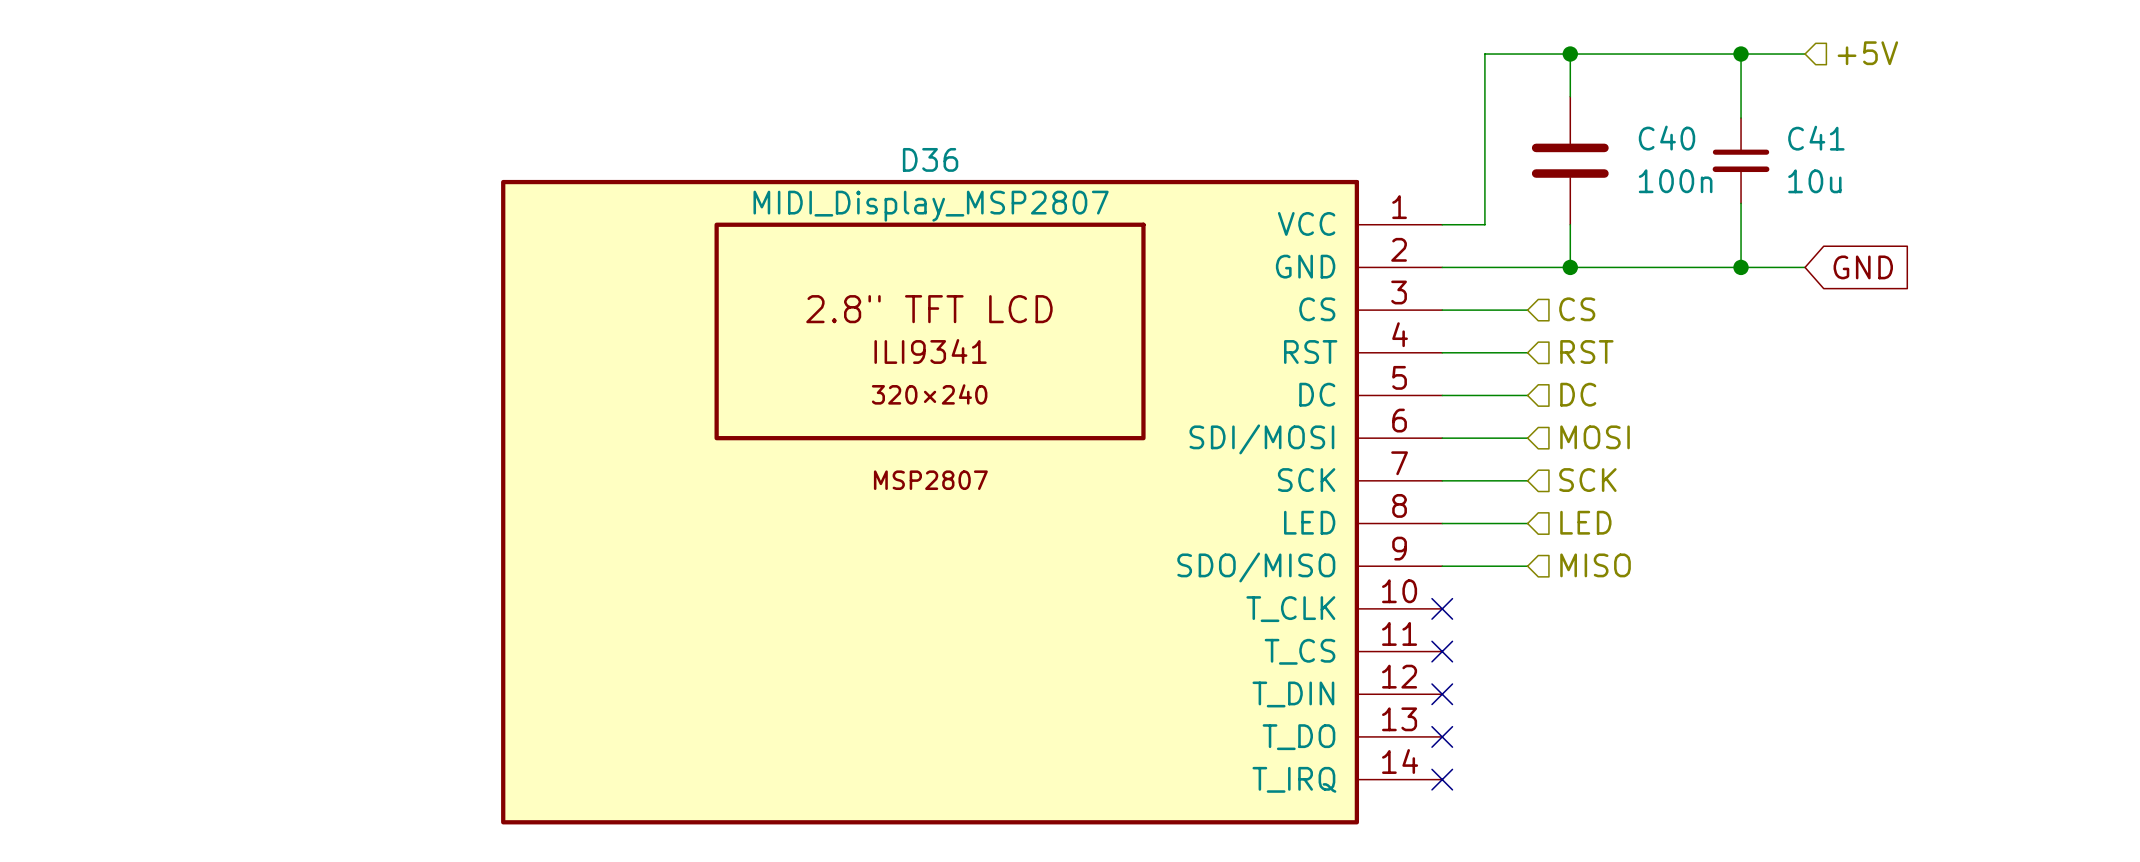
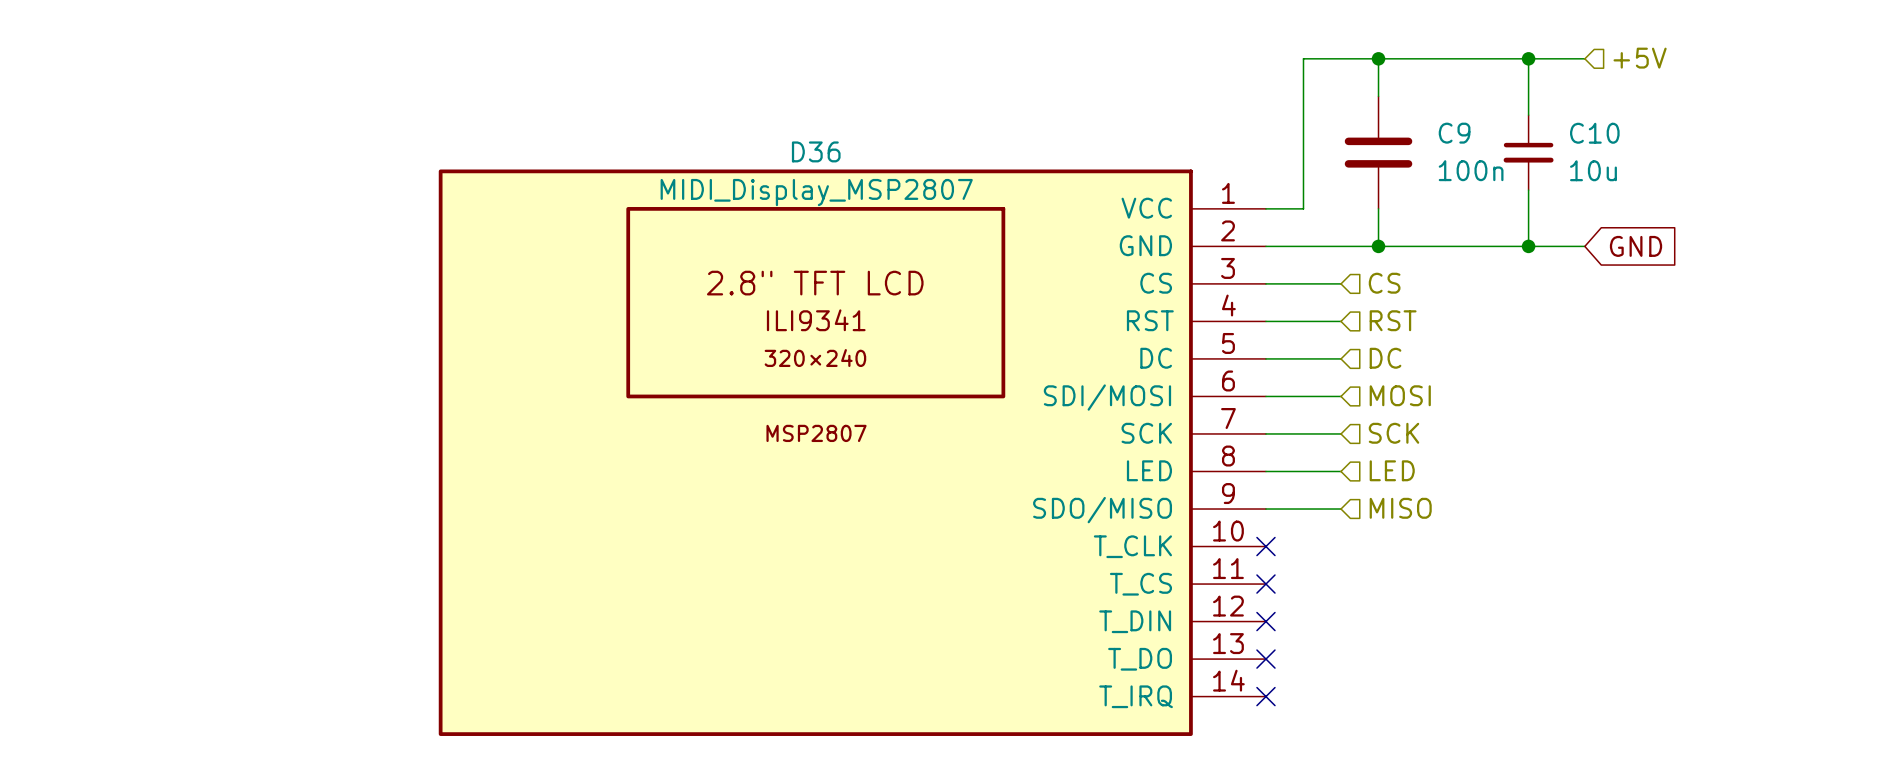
C40 name: C40 (1667, 138) -> C9 (1454, 133)
C41 name: C41 (1816, 138) -> C10 (1594, 133)

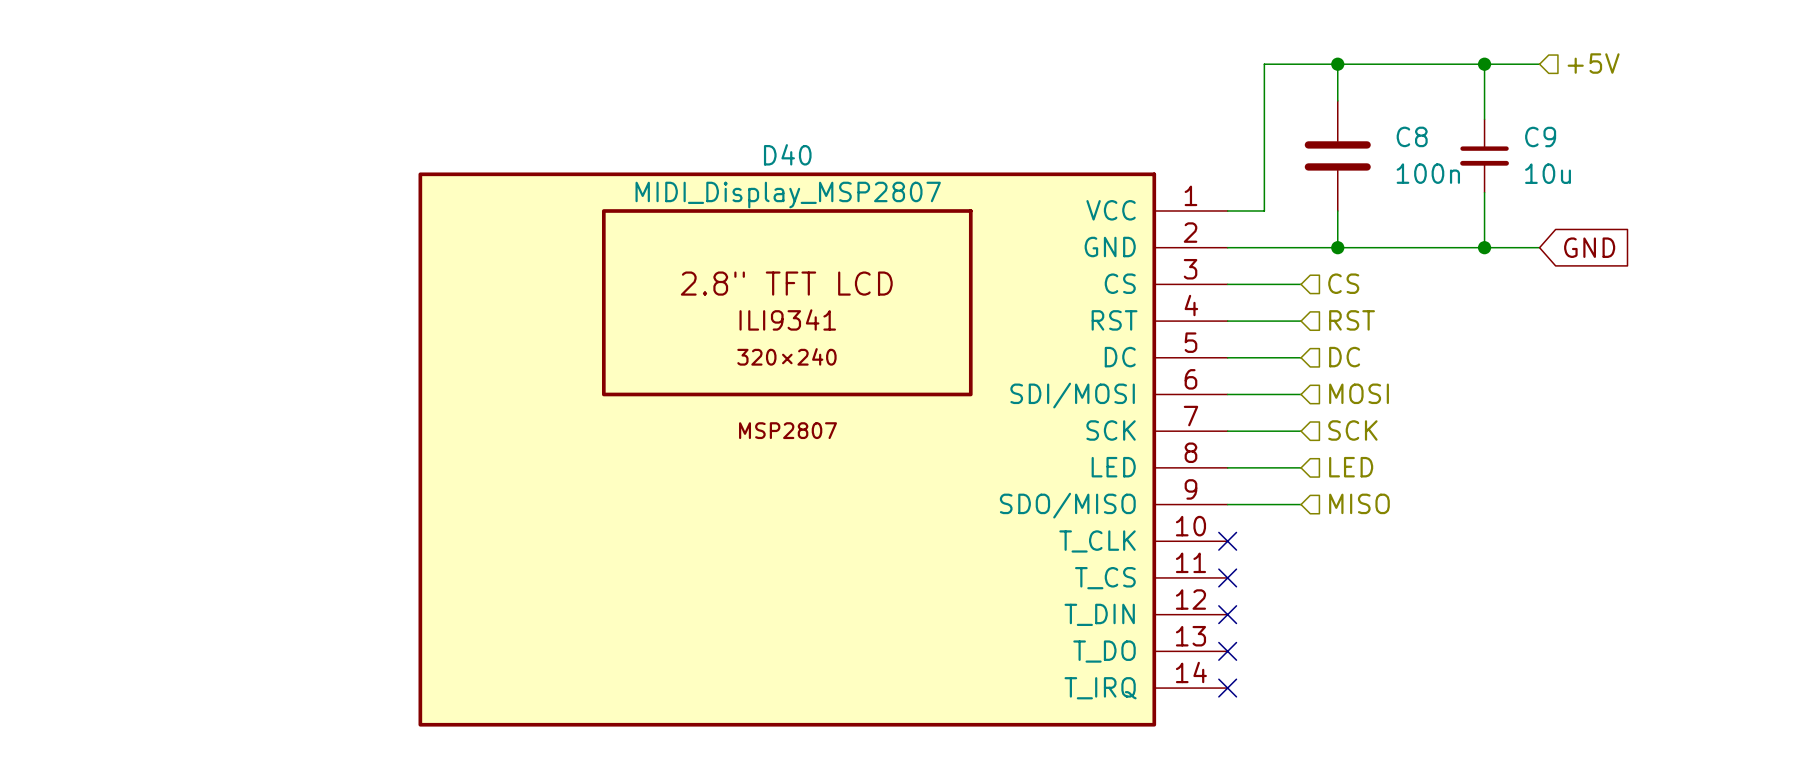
C9 name: C9 (1454, 133) -> C8 (1412, 136)
C10 name: C10 (1594, 133) -> C9 (1540, 137)
D36 name: D36 (816, 151) -> D40 (787, 154)

